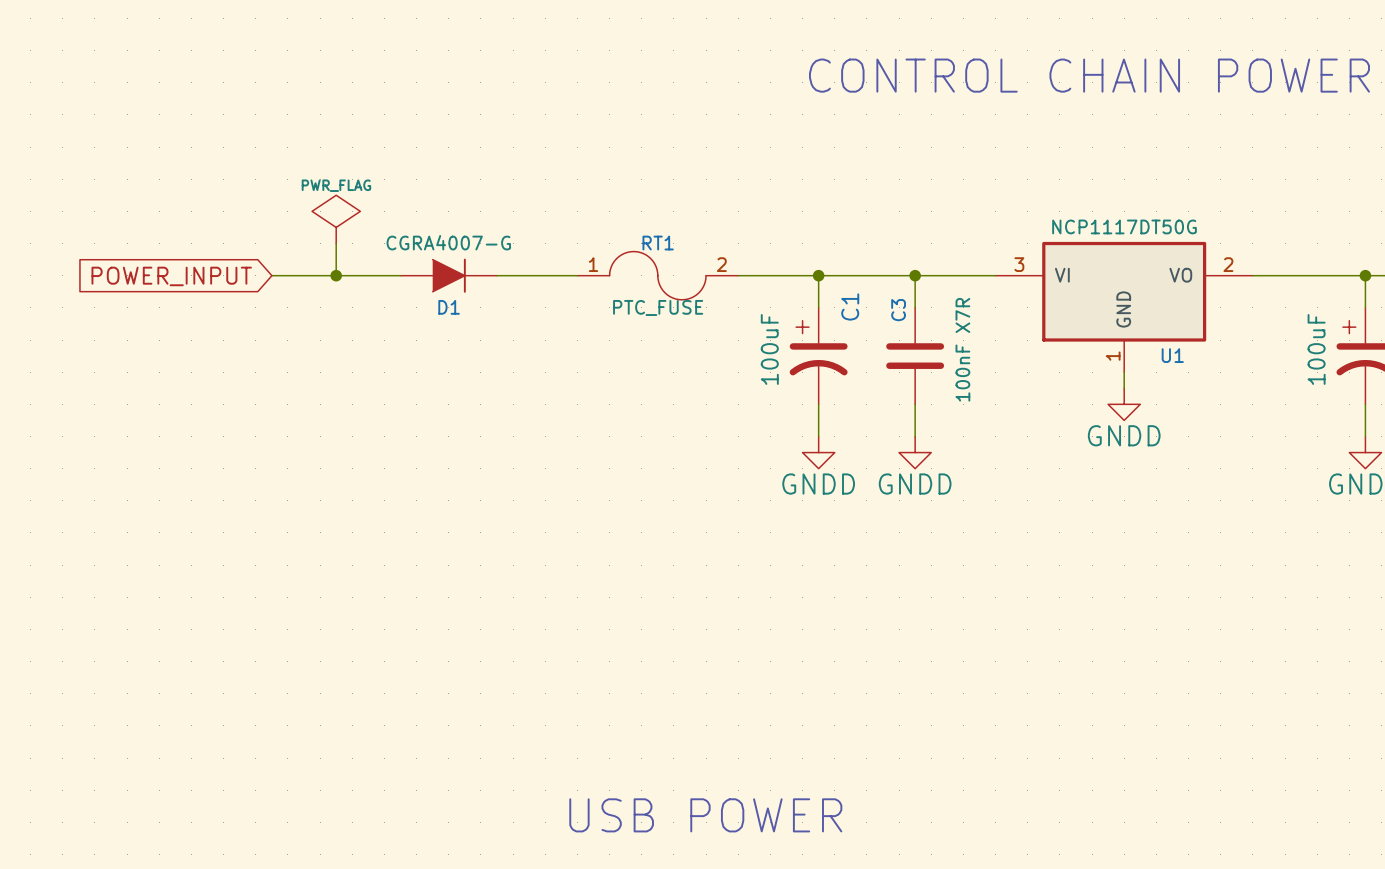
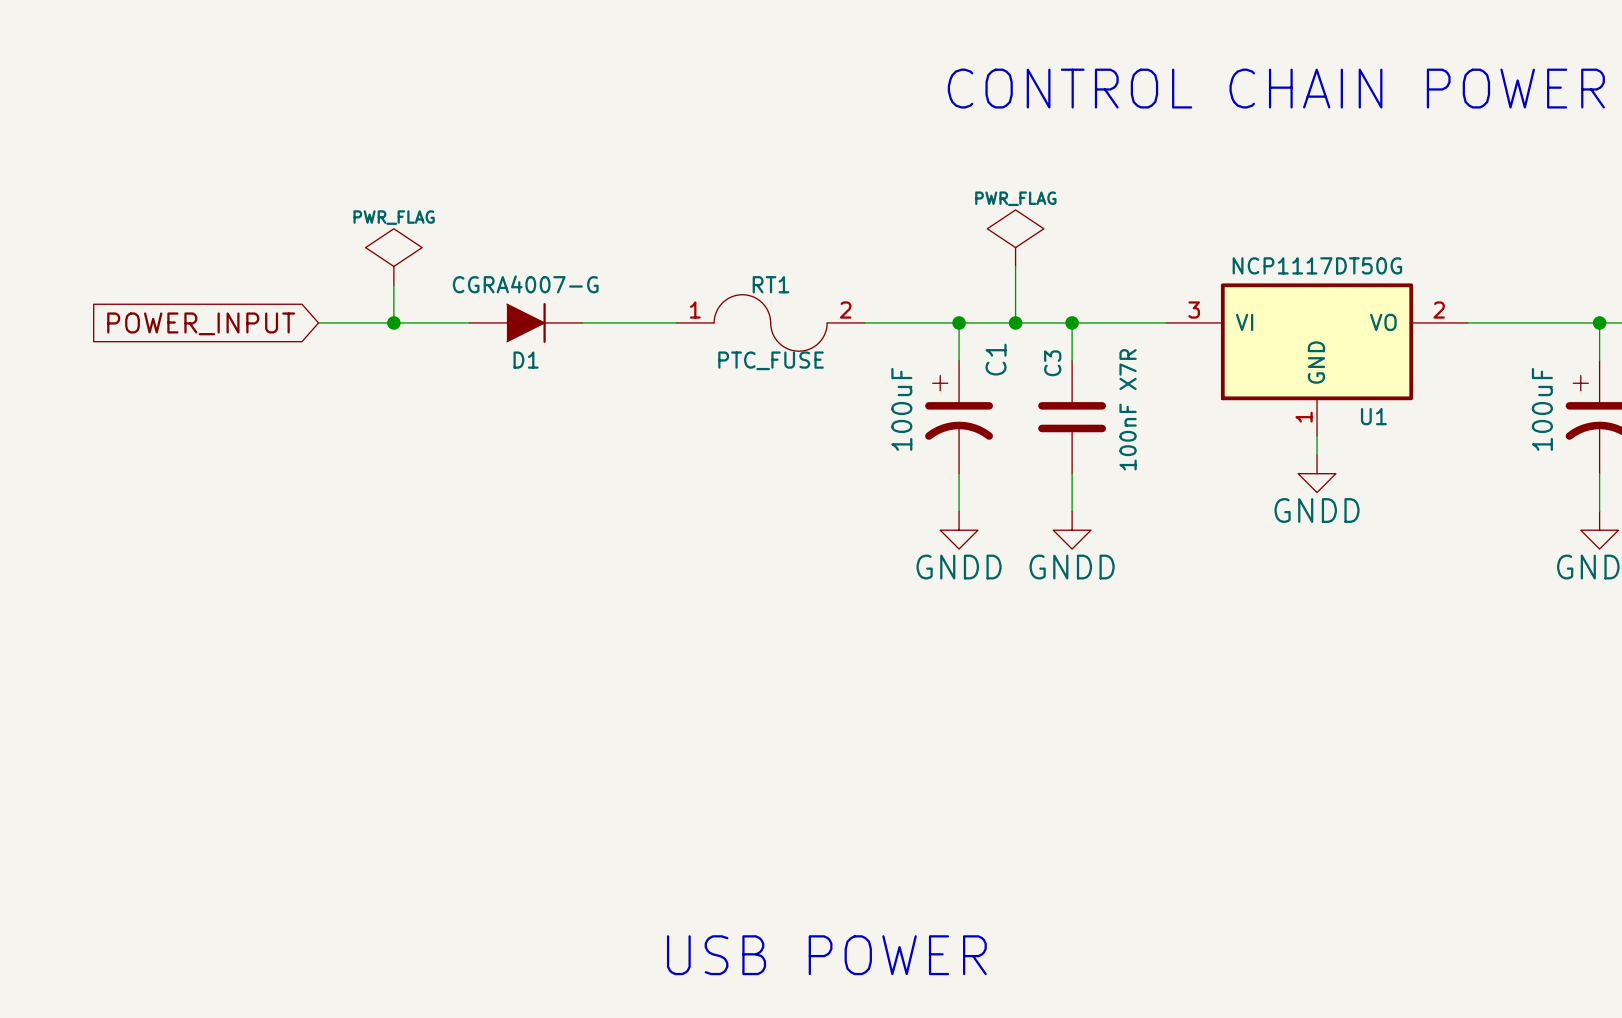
power symbol: none -> PWR_FLAG (1015, 238)
wire: none -> (1015, 266) (1015, 322)
junction: none -> (1015, 322)

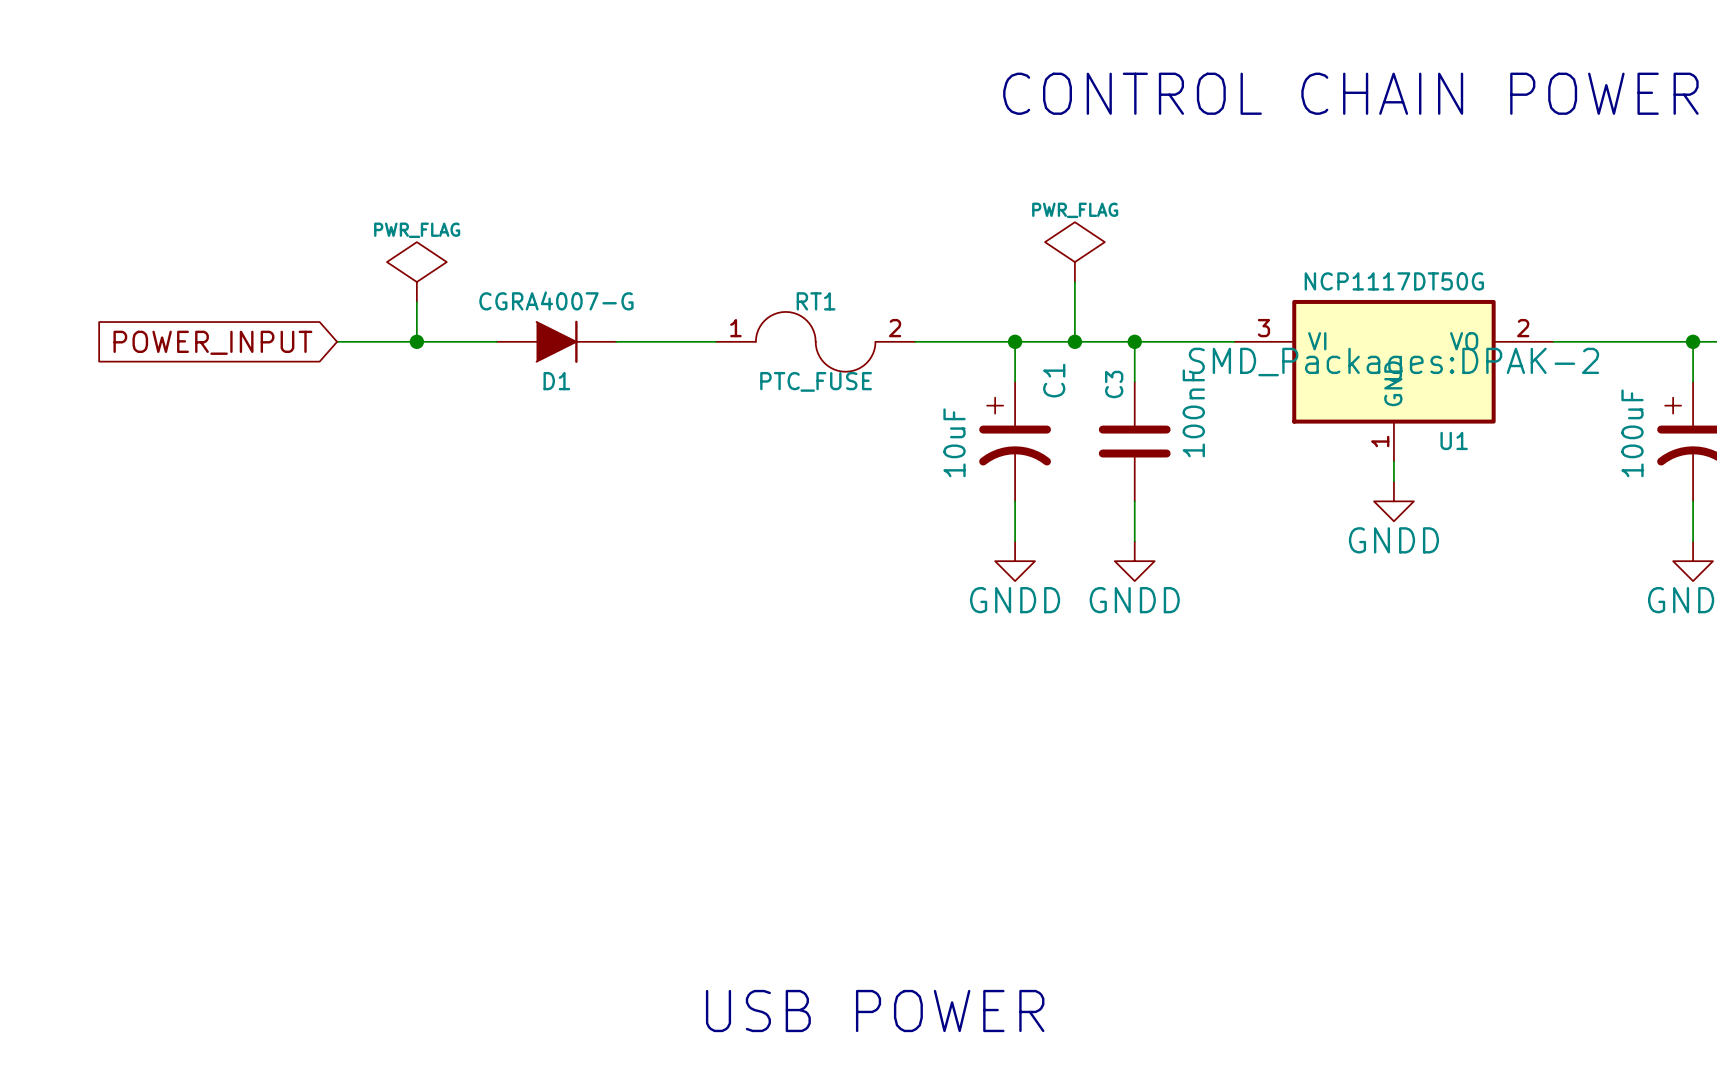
U1 text: none -> SMD_Packages:DPAK-2 (1393, 364)
C1 value: 100uF (901, 409) -> 10uF (954, 442)
C3 value: 100nF X7R (1128, 409) -> 100nF (1193, 413)

